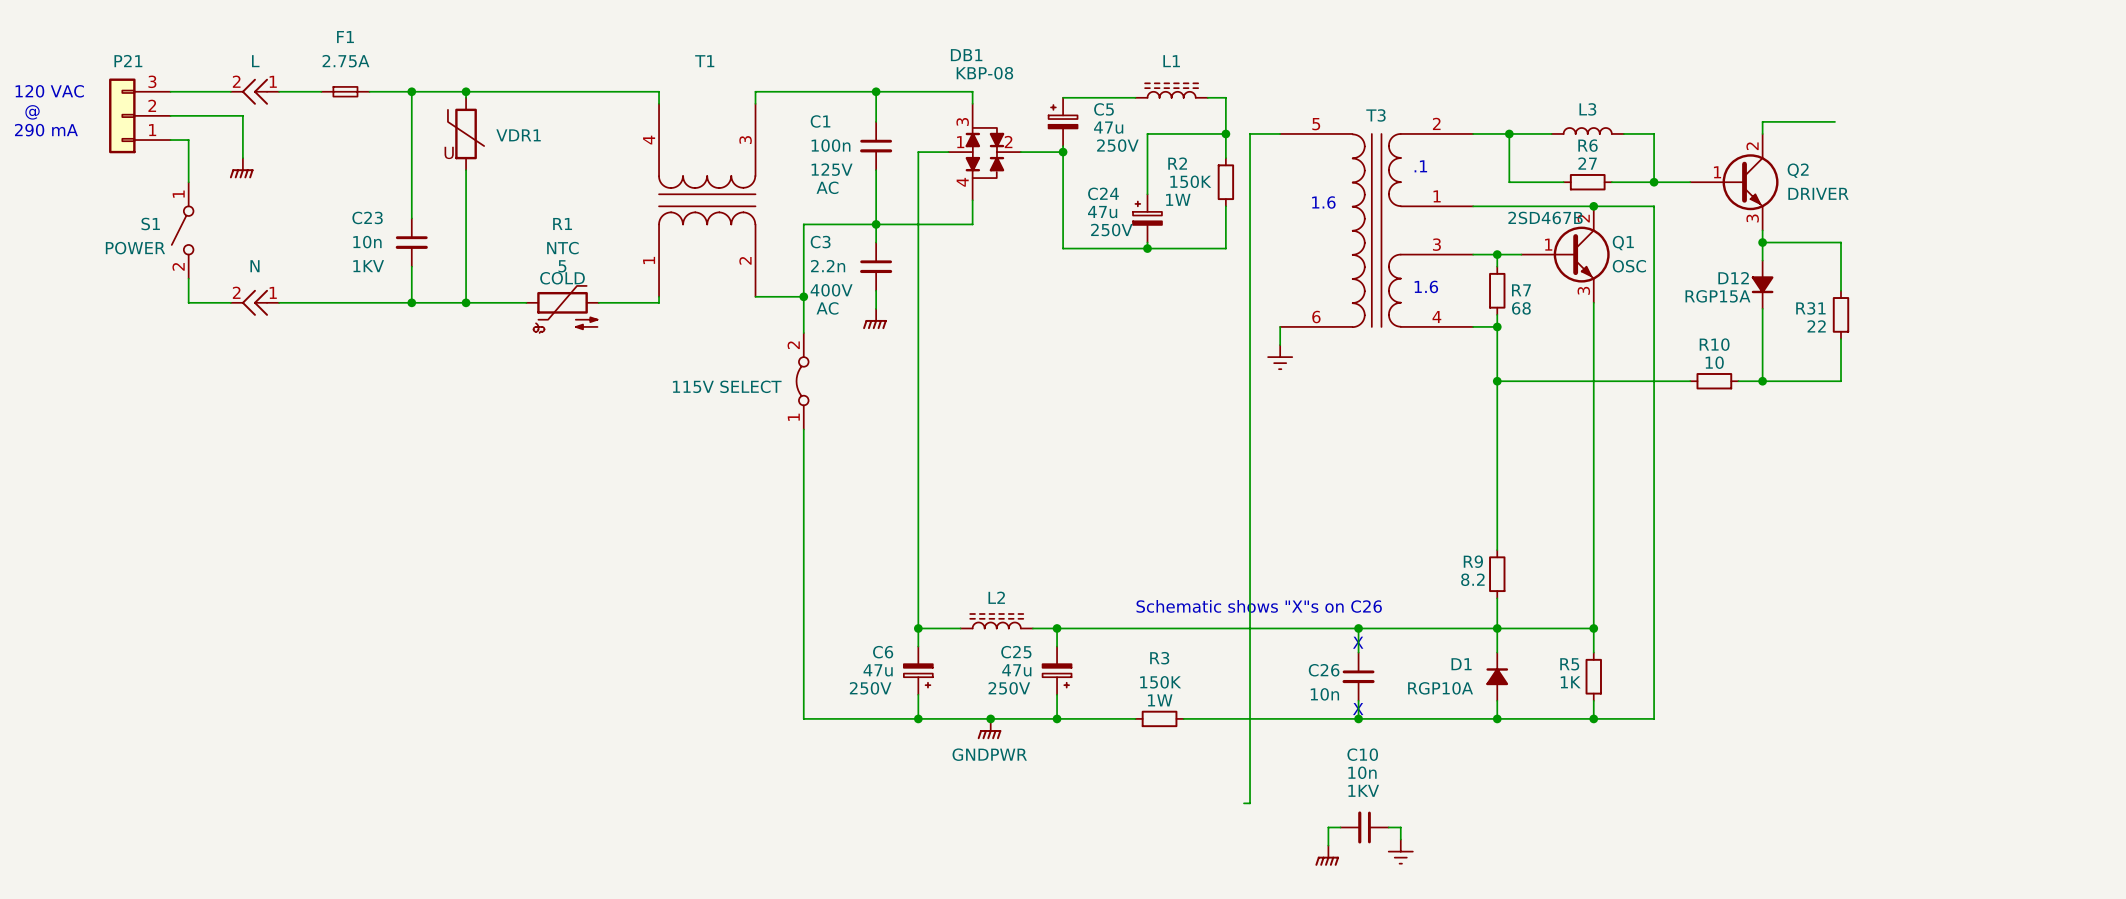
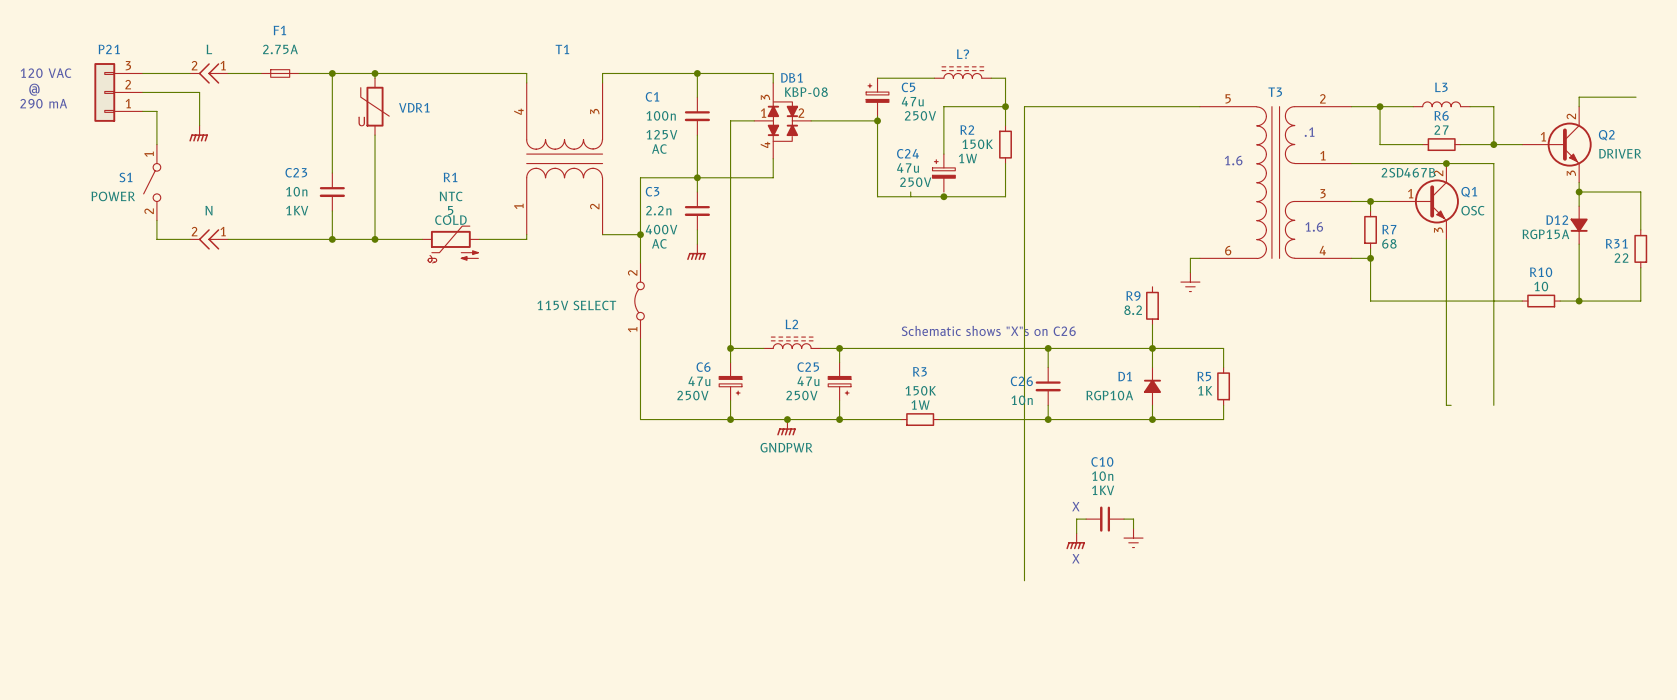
DB1 name position: DB1 (966, 55) -> DB1 (791, 77)
DB1 value position: KBP-08 (984, 73) -> KBP-08 (806, 92)
L1: (1171, 90) -> none
L?: none -> (962, 72)
wire: (1063, 97) (1105, 97) -> (844, 120) (877, 120)
wire: none -> (901, 78) (934, 78)
wire: (1207, 97) (1225, 97) (1225, 158) -> (991, 78) (1005, 78) (1005, 125)
C5 position: (1063, 121) -> (877, 97)
wire: (1834, 121) (1762, 121) (1762, 133) -> (1636, 97) (1579, 97) (1579, 106)
L3 position: (1587, 130) -> (1441, 104)
wire: (1189, 133) (1147, 133) (1147, 194) -> (943, 106) (943, 154)
junction position: (1225, 133) -> (1005, 106)
wire: (1250, 133) (1250, 803) (1243, 803) -> (991, 106) (972, 106)
wire: (1268, 133) (1280, 133) -> none
wire: none -> (1166, 106) (1024, 106) (1024, 580)
wire: (1509, 133) (1509, 182) (1563, 182) -> (1380, 106) (1380, 144) (1422, 144)
junction: (1509, 133) -> none
wire: (1623, 133) (1654, 133) (1654, 182) -> (1470, 106) (1493, 106) (1493, 144)
wire: none -> (1351, 106) (1413, 106)
junction: none -> (1380, 106)
wire: (1063, 146) (1063, 248) (1105, 248) -> (877, 116) (877, 196)
junction position: (1063, 152) -> (877, 120)
text position: .1 (1420, 166) -> .1 (1309, 132)
R2 position: (1225, 182) -> (1005, 144)
R6 position: (1587, 182) -> (1441, 144)
wire: (1611, 182) (1690, 182) -> (1460, 144) (1522, 144)
junction: (1654, 182) -> none
Q2 position: (1734, 182) -> (1556, 144)
junction: none -> (1493, 144)
text: 1.6 (1323, 202) -> none
text: none -> 1.6 (1233, 160)
wire: (1225, 206) (1225, 248) -> (1005, 163) (1005, 196) (972, 196)
wire: (1473, 206) (1654, 206) (1654, 718) (1183, 718) -> none
junction: (1593, 206) -> none
wire: none -> (1351, 163) (1493, 163) (1493, 405)
junction: none -> (1446, 163)
C24 position: (1147, 218) -> (943, 173)
T3 position: (1376, 230) -> (1275, 182)
wire: (1762, 230) (1762, 260) -> (1579, 182) (1579, 206)
wire: (1762, 242) (1841, 242) (1841, 290) -> (1579, 192) (1640, 192) (1640, 229)
junction position: (1762, 242) -> (1370, 201)
junction: none -> (1579, 192)
junction position: (1147, 248) -> (943, 196)
wire: (1473, 254) (1521, 254) -> (1351, 201) (1389, 201)
wire: (1497, 254) (1497, 266) -> (1370, 201) (1370, 210)
junction: (1497, 254) -> none
Q1 position: (1565, 254) -> (1424, 201)
D12 position: (1762, 284) -> (1579, 225)
text: 1.6 (1426, 286) -> none
text: none -> 1.6 (1314, 226)
R7 position: (1497, 290) -> (1370, 229)
wire: (1593, 302) (1593, 652) -> none
wire: none -> (1446, 239) (1446, 405) (1451, 405)
wire: (1762, 308) (1762, 381) -> (1579, 244) (1579, 301)
wire: (1497, 314) (1497, 550) -> none
wire: none -> (1370, 248) (1370, 301) (1375, 301)
R31 position: (1841, 314) -> (1640, 248)
wire: (1280, 326) (1280, 345) -> none
wire: (1473, 326) (1497, 326) -> (1351, 258) (1370, 258)
junction: (1497, 326) -> none
wire: none -> (1199, 258) (1190, 258) (1190, 272)
junction: none -> (1370, 258)
wire: (1841, 339) (1841, 381) -> (1522, 301) (1455, 301)
wire: none -> (1640, 267) (1640, 301) (1560, 301)
power symbol: (1280, 357) -> none
power symbol: none -> (1190, 282)
wire: (1497, 381) (1690, 381) -> none
junction: (1497, 381) -> none
R10 position: (1714, 381) -> (1541, 301)
junction: (1762, 381) -> none
junction: none -> (1579, 301)
junction: none -> (730, 348)
wire: none -> (820, 348) (1223, 348) (1223, 367)
junction: none -> (839, 348)
junction: none -> (1048, 348)
junction: none -> (1152, 348)
wire: none -> (1223, 405) (1223, 419) (939, 419)
wire: (803, 531) (803, 718) (1135, 718) -> (640, 419) (901, 419)
wire: (918, 531) (918, 646) -> none
junction: none -> (730, 419)
junction: none -> (787, 419)
junction: none -> (839, 419)
junction: none -> (1048, 419)
junction: none -> (1152, 419)
R9 position: (1497, 574) -> (1152, 305)
wire: (1497, 598) (1497, 652) -> (1152, 324) (1152, 367)
text position: Schematic shows "X"s on C26 (1259, 606) -> Schematic shows "X"s on C26 (988, 330)
L2 position: (996, 621) -> (792, 342)
wire: (918, 628) (960, 628) -> (730, 348) (763, 348)
junction: (918, 628) -> none
wire: (1032, 628) (1593, 628) -> none
wire: (1057, 628) (1057, 646) -> (839, 348) (839, 362)
junction: (1057, 628) -> none
wire: (1358, 628) (1358, 652) -> (1048, 348) (1048, 367)
junction: (1358, 628) -> none
junction: (1497, 628) -> none
junction: (1593, 628) -> none
C6 position: (918, 670) -> (730, 381)
C25 position: (1057, 670) -> (839, 381)
C26 position: (1358, 676) -> (1048, 386)
D1 position: (1497, 676) -> (1152, 386)
R5 position: (1593, 676) -> (1223, 386)
wire: (918, 694) (918, 718) -> none
wire: (1057, 694) (1057, 718) -> (839, 400) (839, 419)
wire: (1358, 700) (1358, 718) -> (1048, 405) (1048, 419)
wire: (1497, 700) (1497, 718) -> (1152, 405) (1152, 419)
wire: (1593, 700) (1593, 718) -> none
junction: (918, 718) -> none
junction: (990, 718) -> none
junction: (1057, 718) -> none
R3 position: (1159, 718) -> (920, 419)
junction: (1358, 718) -> none
junction: (1497, 718) -> none
junction: (1593, 718) -> none
power symbol position: GNDPWR (989, 729) -> GNDPWR (786, 427)
wire: (1340, 827) (1328, 827) (1328, 845) -> (1086, 519) (1076, 519) (1076, 533)
C10 position: (1364, 827) -> (1105, 519)
wire: (1388, 827) (1400, 827) (1400, 839) -> (1124, 519) (1133, 519) (1133, 528)
power symbol position: (1400, 851) -> (1133, 538)
power symbol position: (1327, 855) -> (1075, 541)

